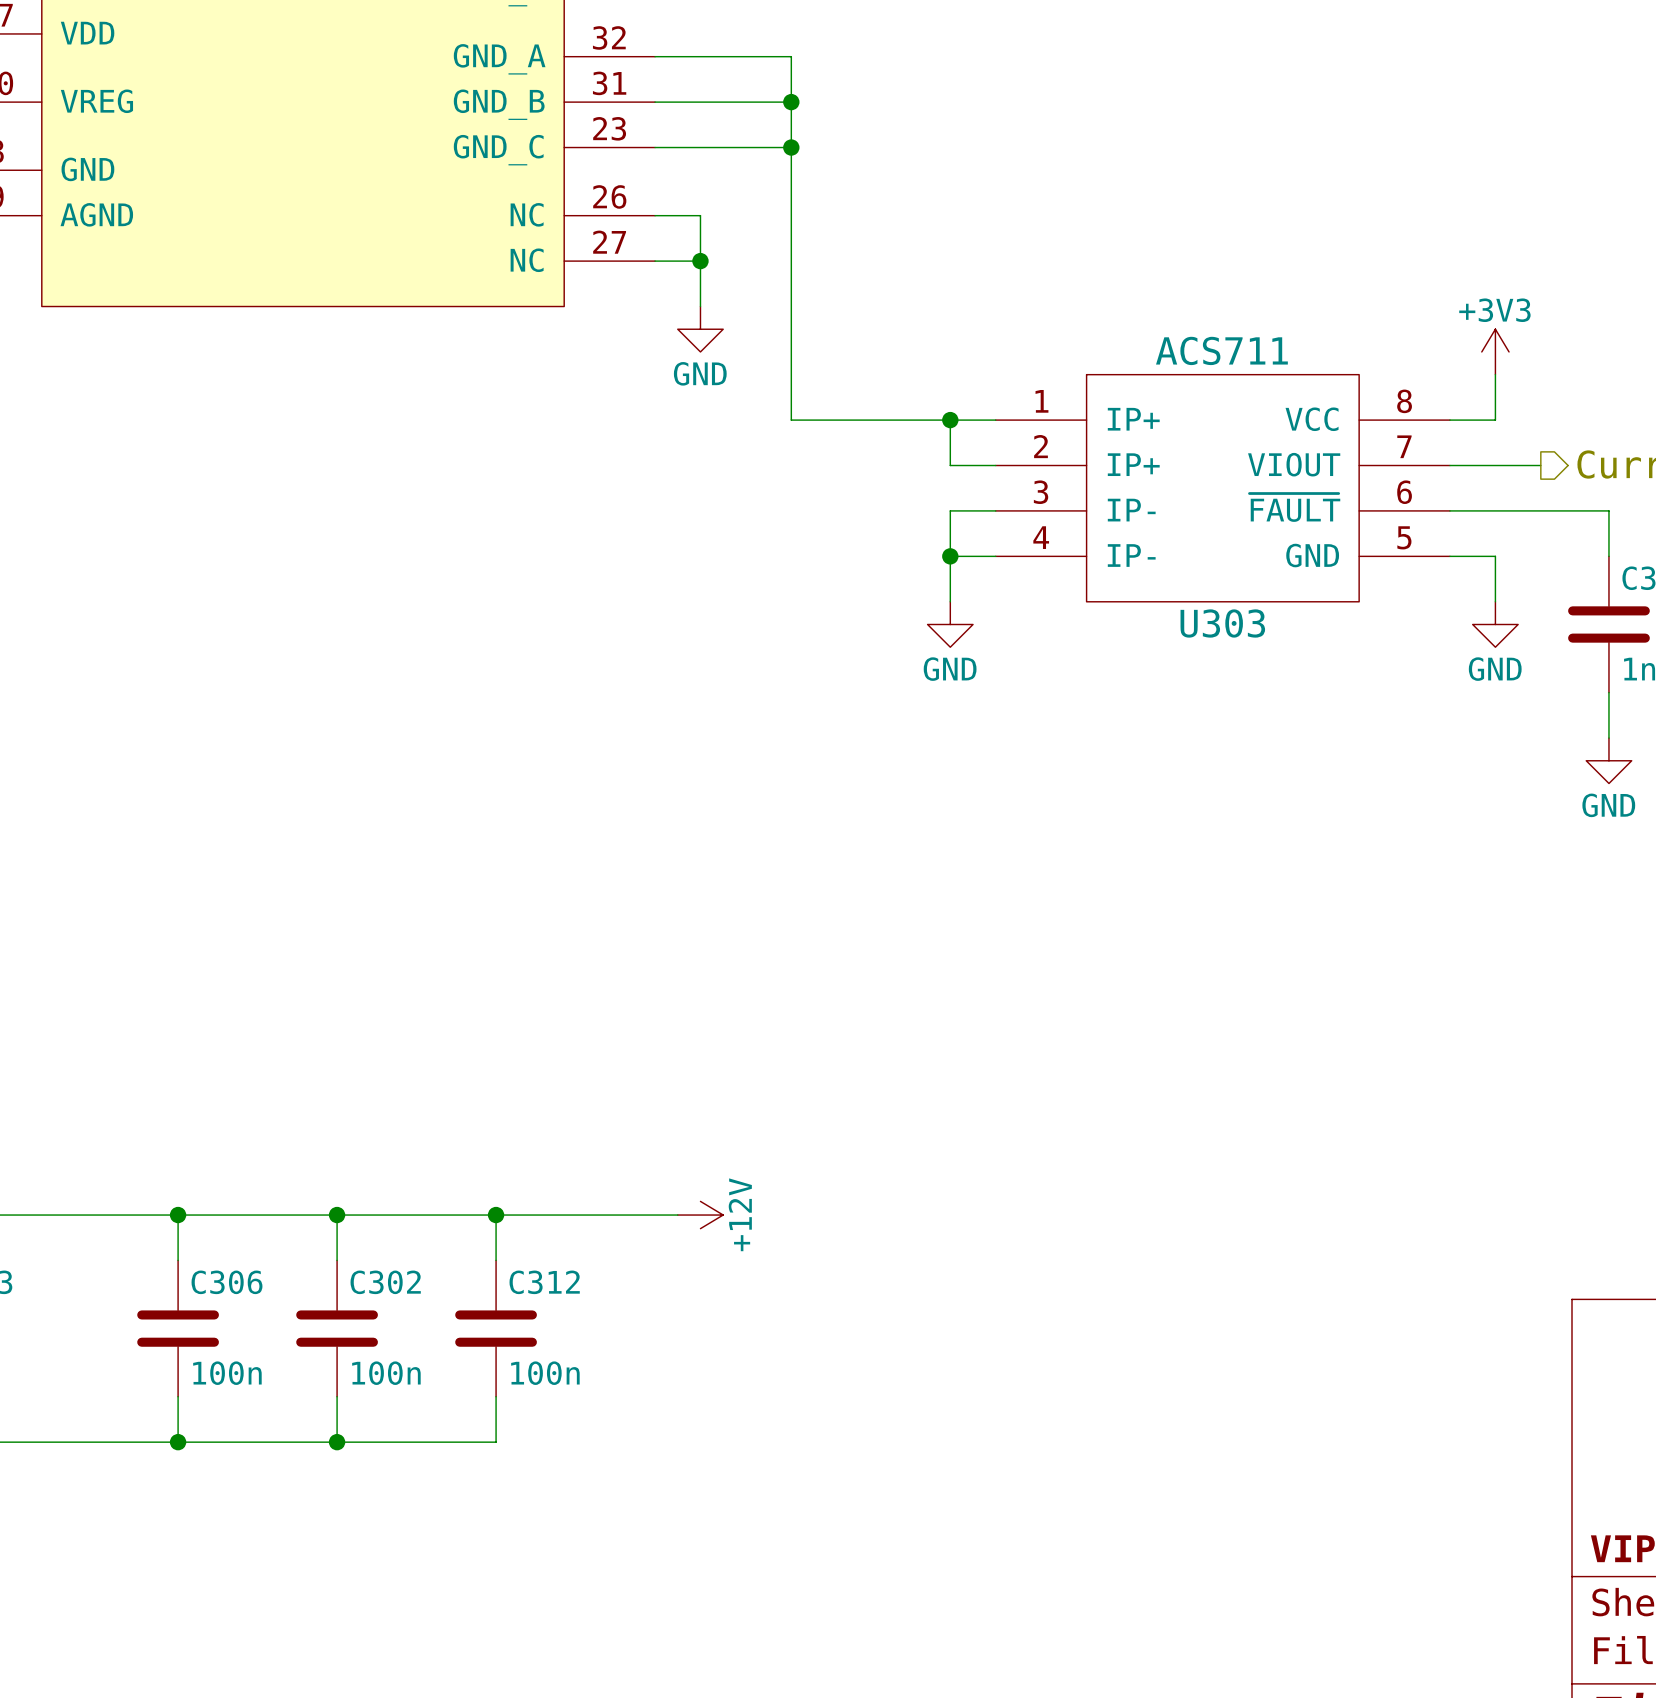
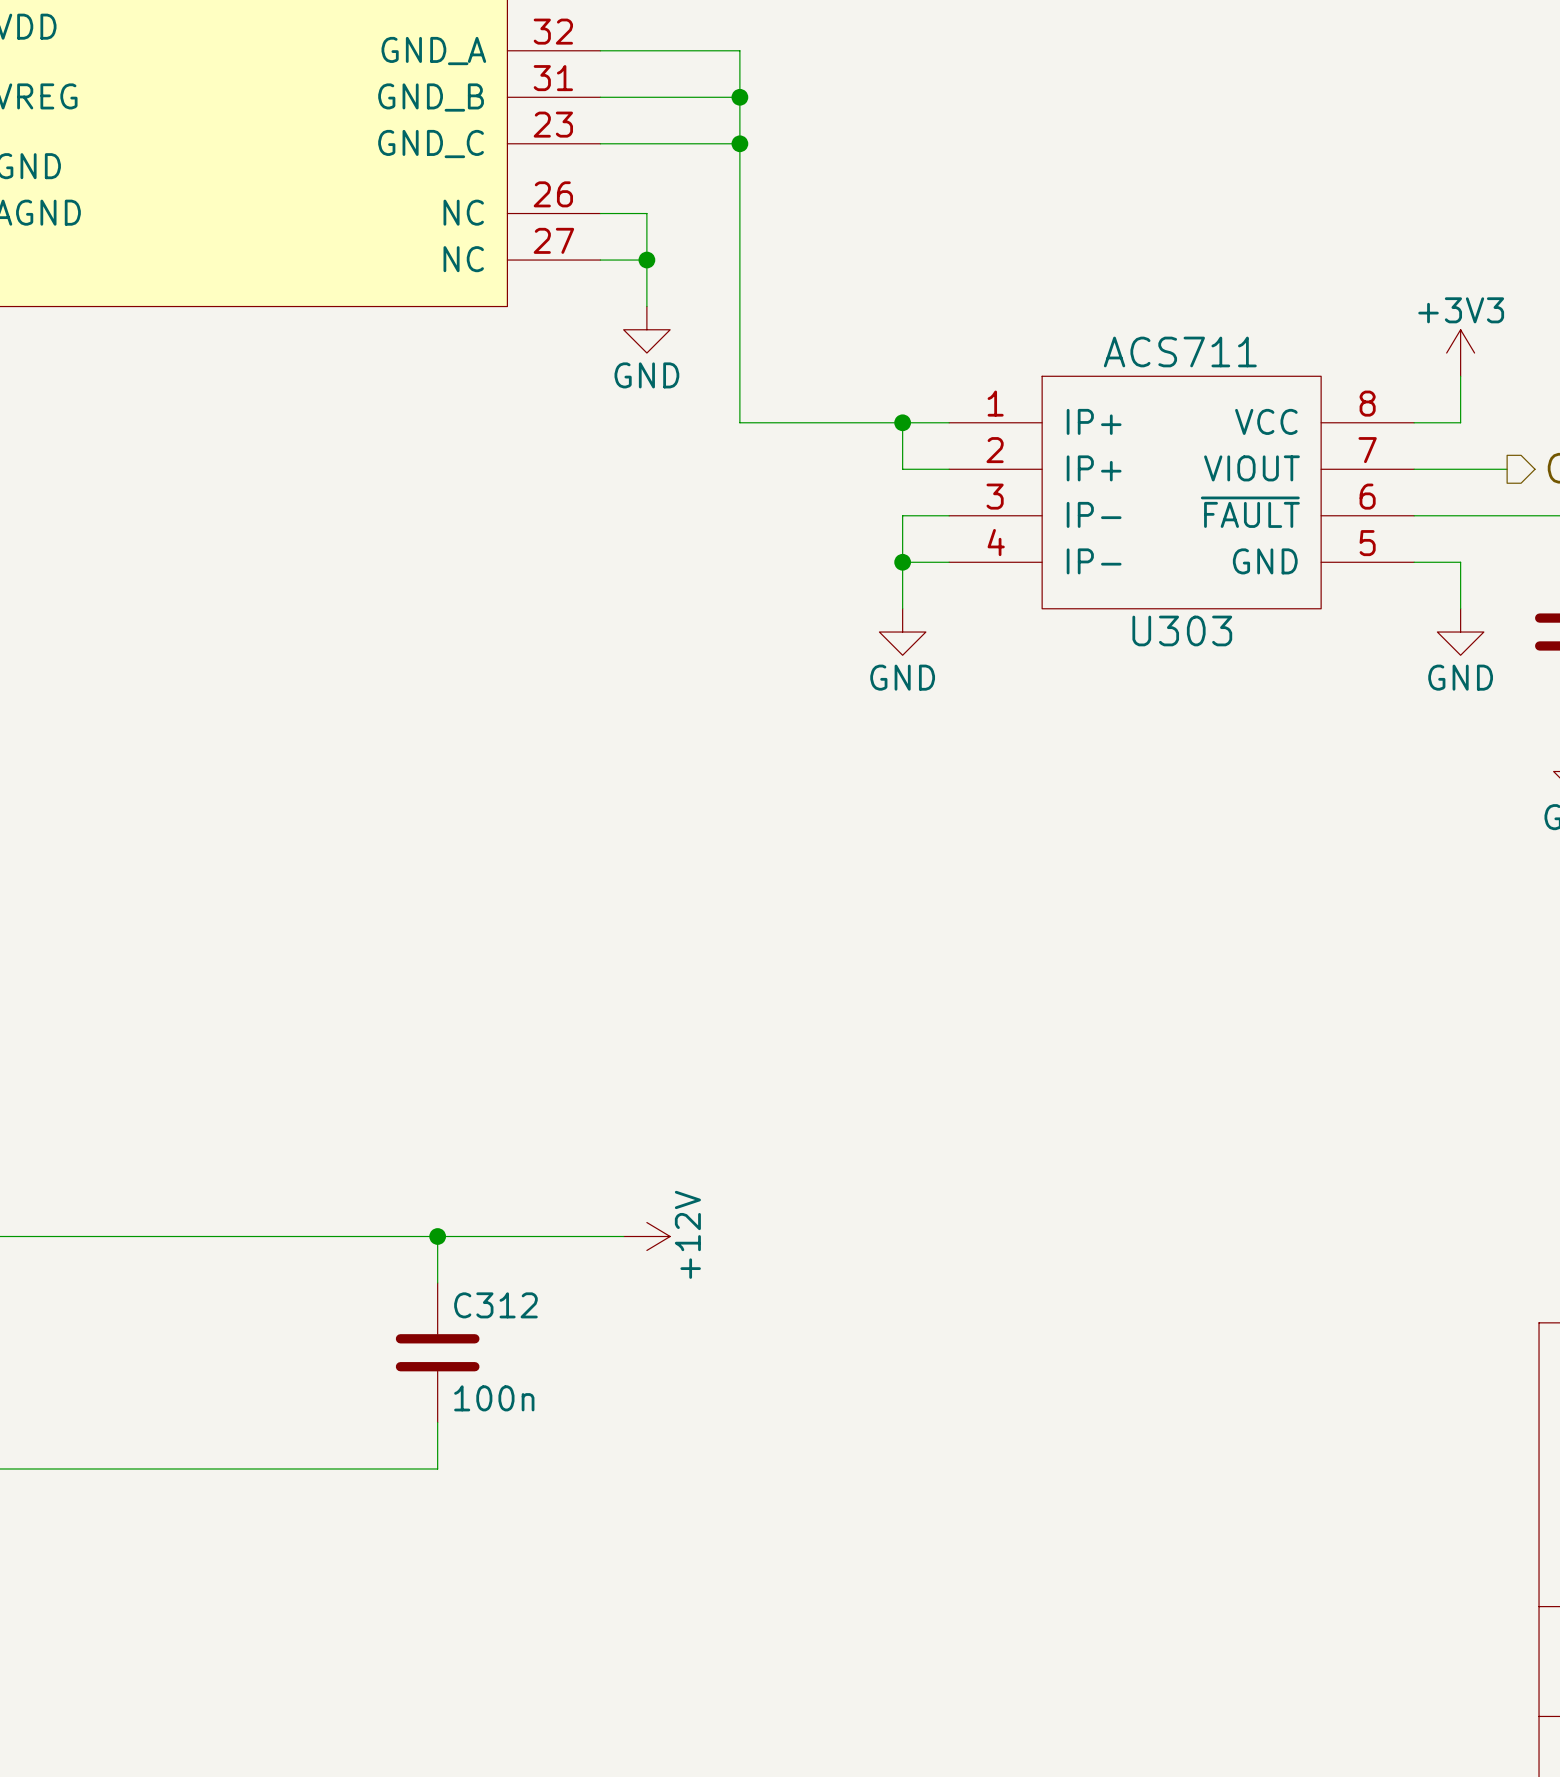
wire: (178, 1215) (178, 1260) -> none
junction: (178, 1215) -> none
wire: (337, 1215) (337, 1260) -> none
junction: (337, 1215) -> none
C306: 100n (178, 1328) -> none
C302: 100n (337, 1328) -> none
wire: (178, 1396) (178, 1442) -> none
wire: (337, 1396) (337, 1442) -> none
junction: (178, 1442) -> none
junction: (337, 1442) -> none

